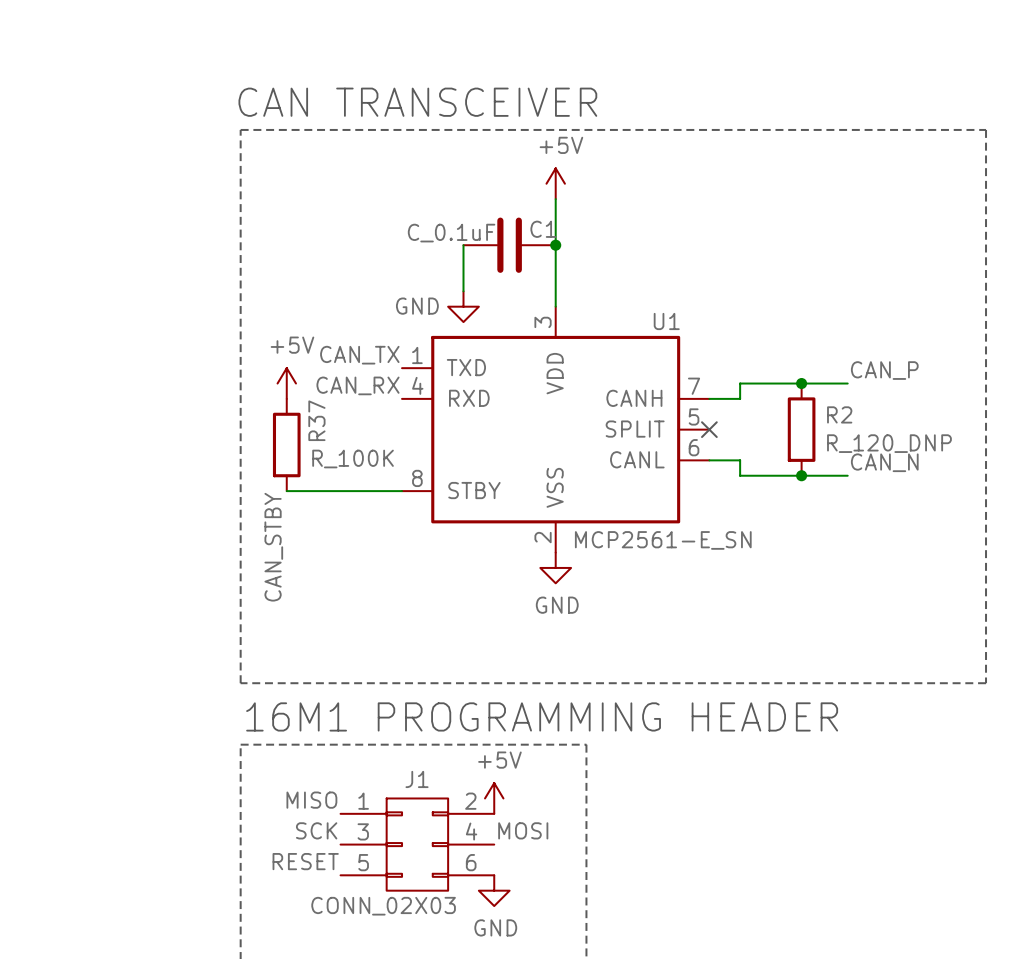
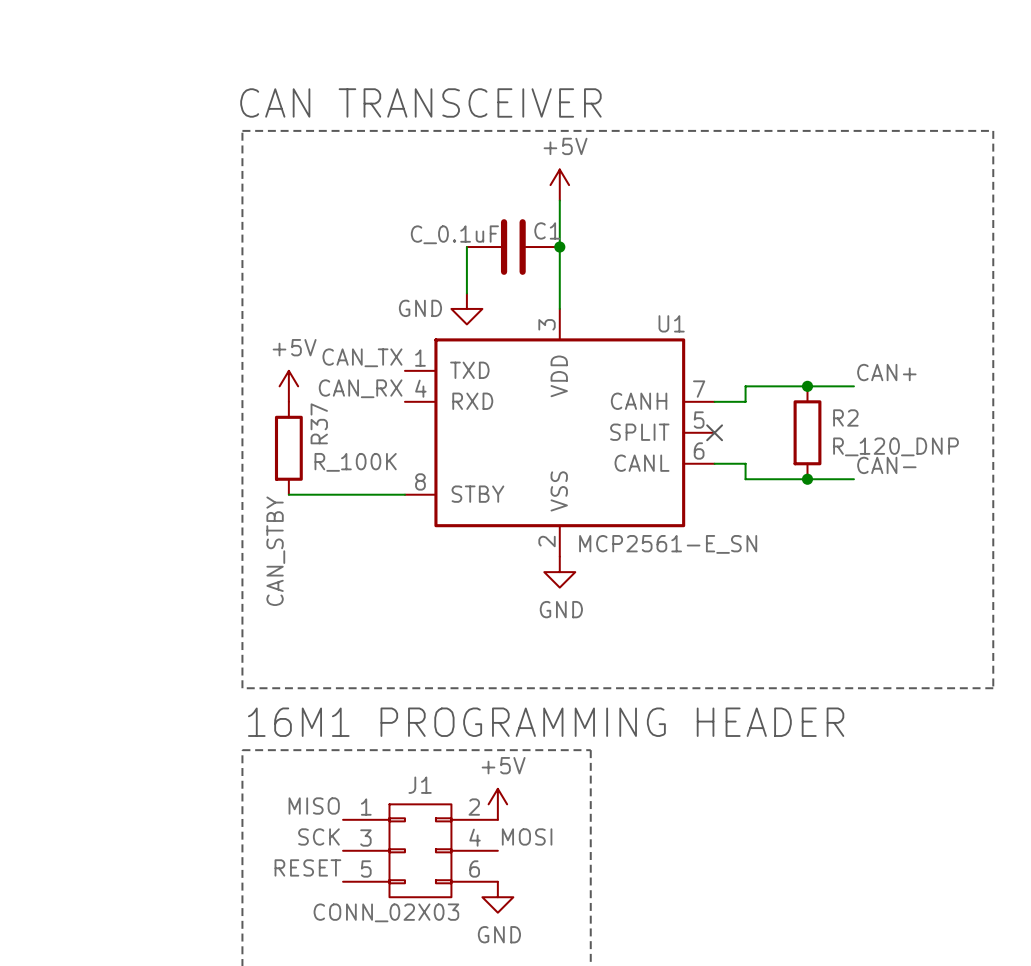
label: CAN_P (884, 370) -> CAN+ (886, 372)
label: CAN_N (884, 462) -> CAN- (886, 465)

